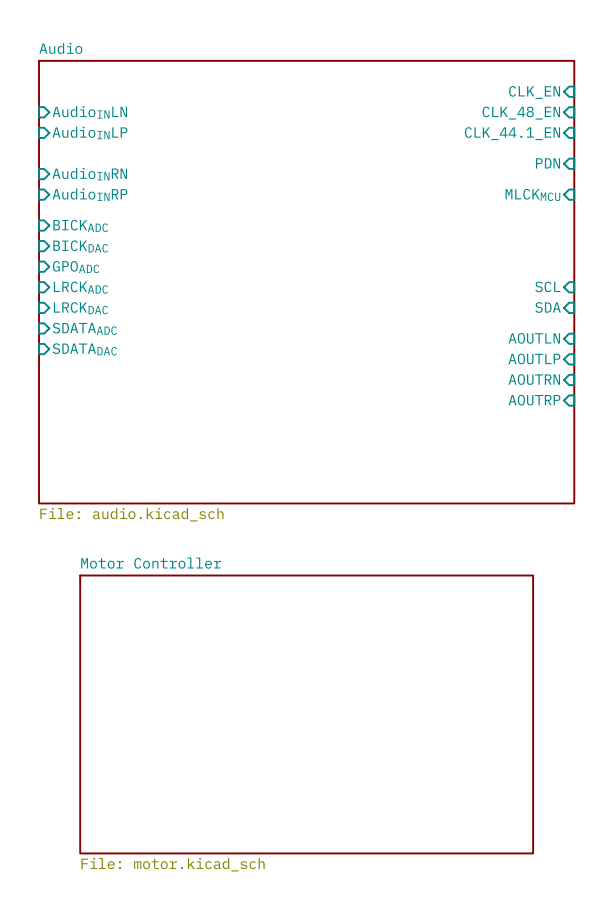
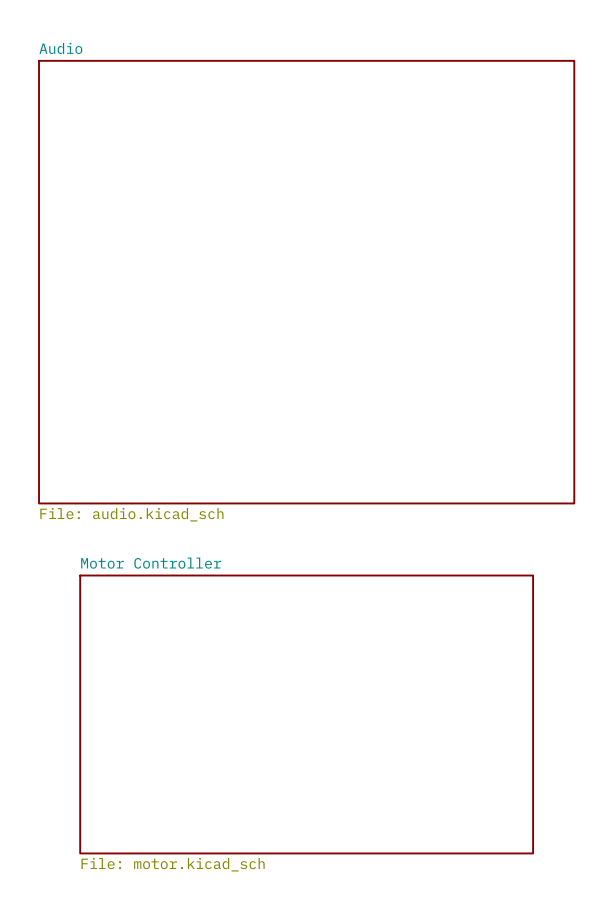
sheet pin: CLK_EN (534, 92) -> none
sheet pin: AudioINLN (89, 112) -> none
sheet pin: CLK_48_EN (521, 113) -> none
sheet pin: AudioINLP (89, 132) -> none
sheet pin: CLK_44.1_EN (512, 133) -> none
sheet pin: PDN (548, 163) -> none
sheet pin: AudioINRN (89, 174) -> none
sheet pin: AudioINRP (89, 194) -> none
sheet pin: MLCKMCU (532, 195) -> none
sheet pin: BICKADC (80, 225) -> none
sheet pin: BICKDAC (80, 246) -> none
sheet pin: GPOADC (76, 267) -> none
sheet pin: SCL (547, 286) -> none
sheet pin: LRCKADC (80, 287) -> none
sheet pin: SDA (548, 307) -> none
sheet pin: LRCKDAC (80, 308) -> none
sheet pin: SDATAADC (84, 328) -> none
sheet pin: AOUTLN (534, 338) -> none
sheet pin: SDATADAC (84, 349) -> none
sheet pin: AOUTLP (534, 358) -> none
sheet pin: AOUTRN (534, 379) -> none
sheet pin: AOUTRP (534, 400) -> none

